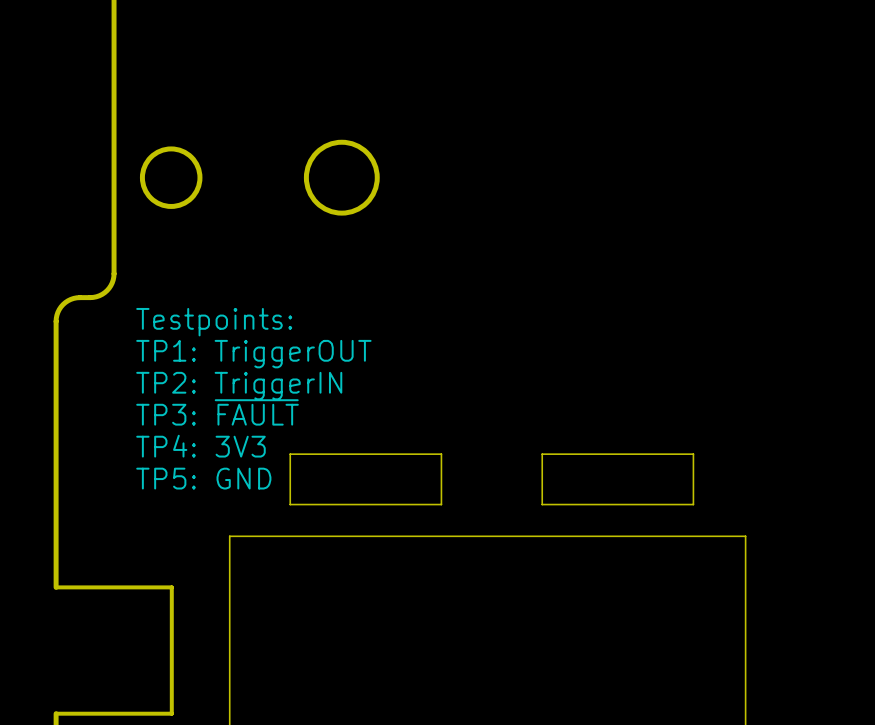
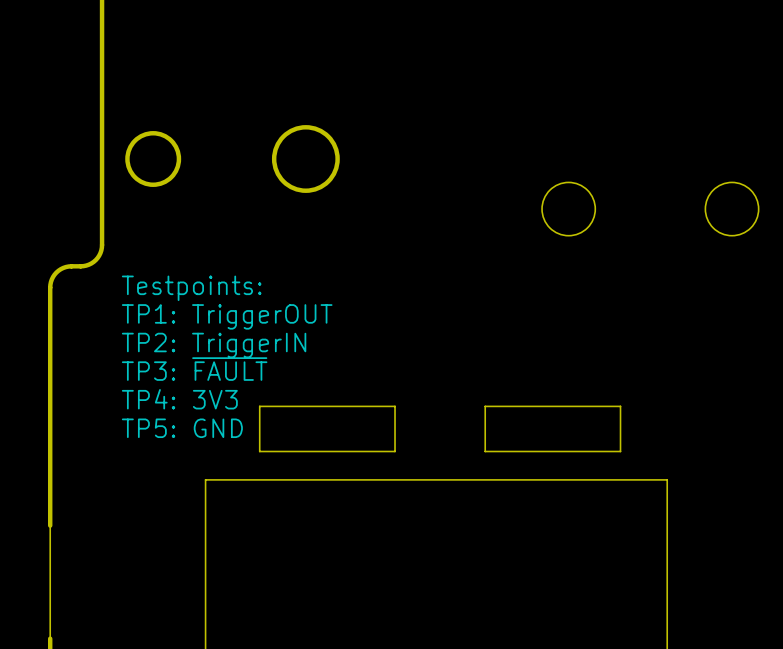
round board edge: none -> [542, 182, 596, 236]
round board edge: none -> [705, 182, 759, 236]
board edge: (56, 587) (171, 587) (171, 713) (56, 713) -> (50, 525) (50, 638)

